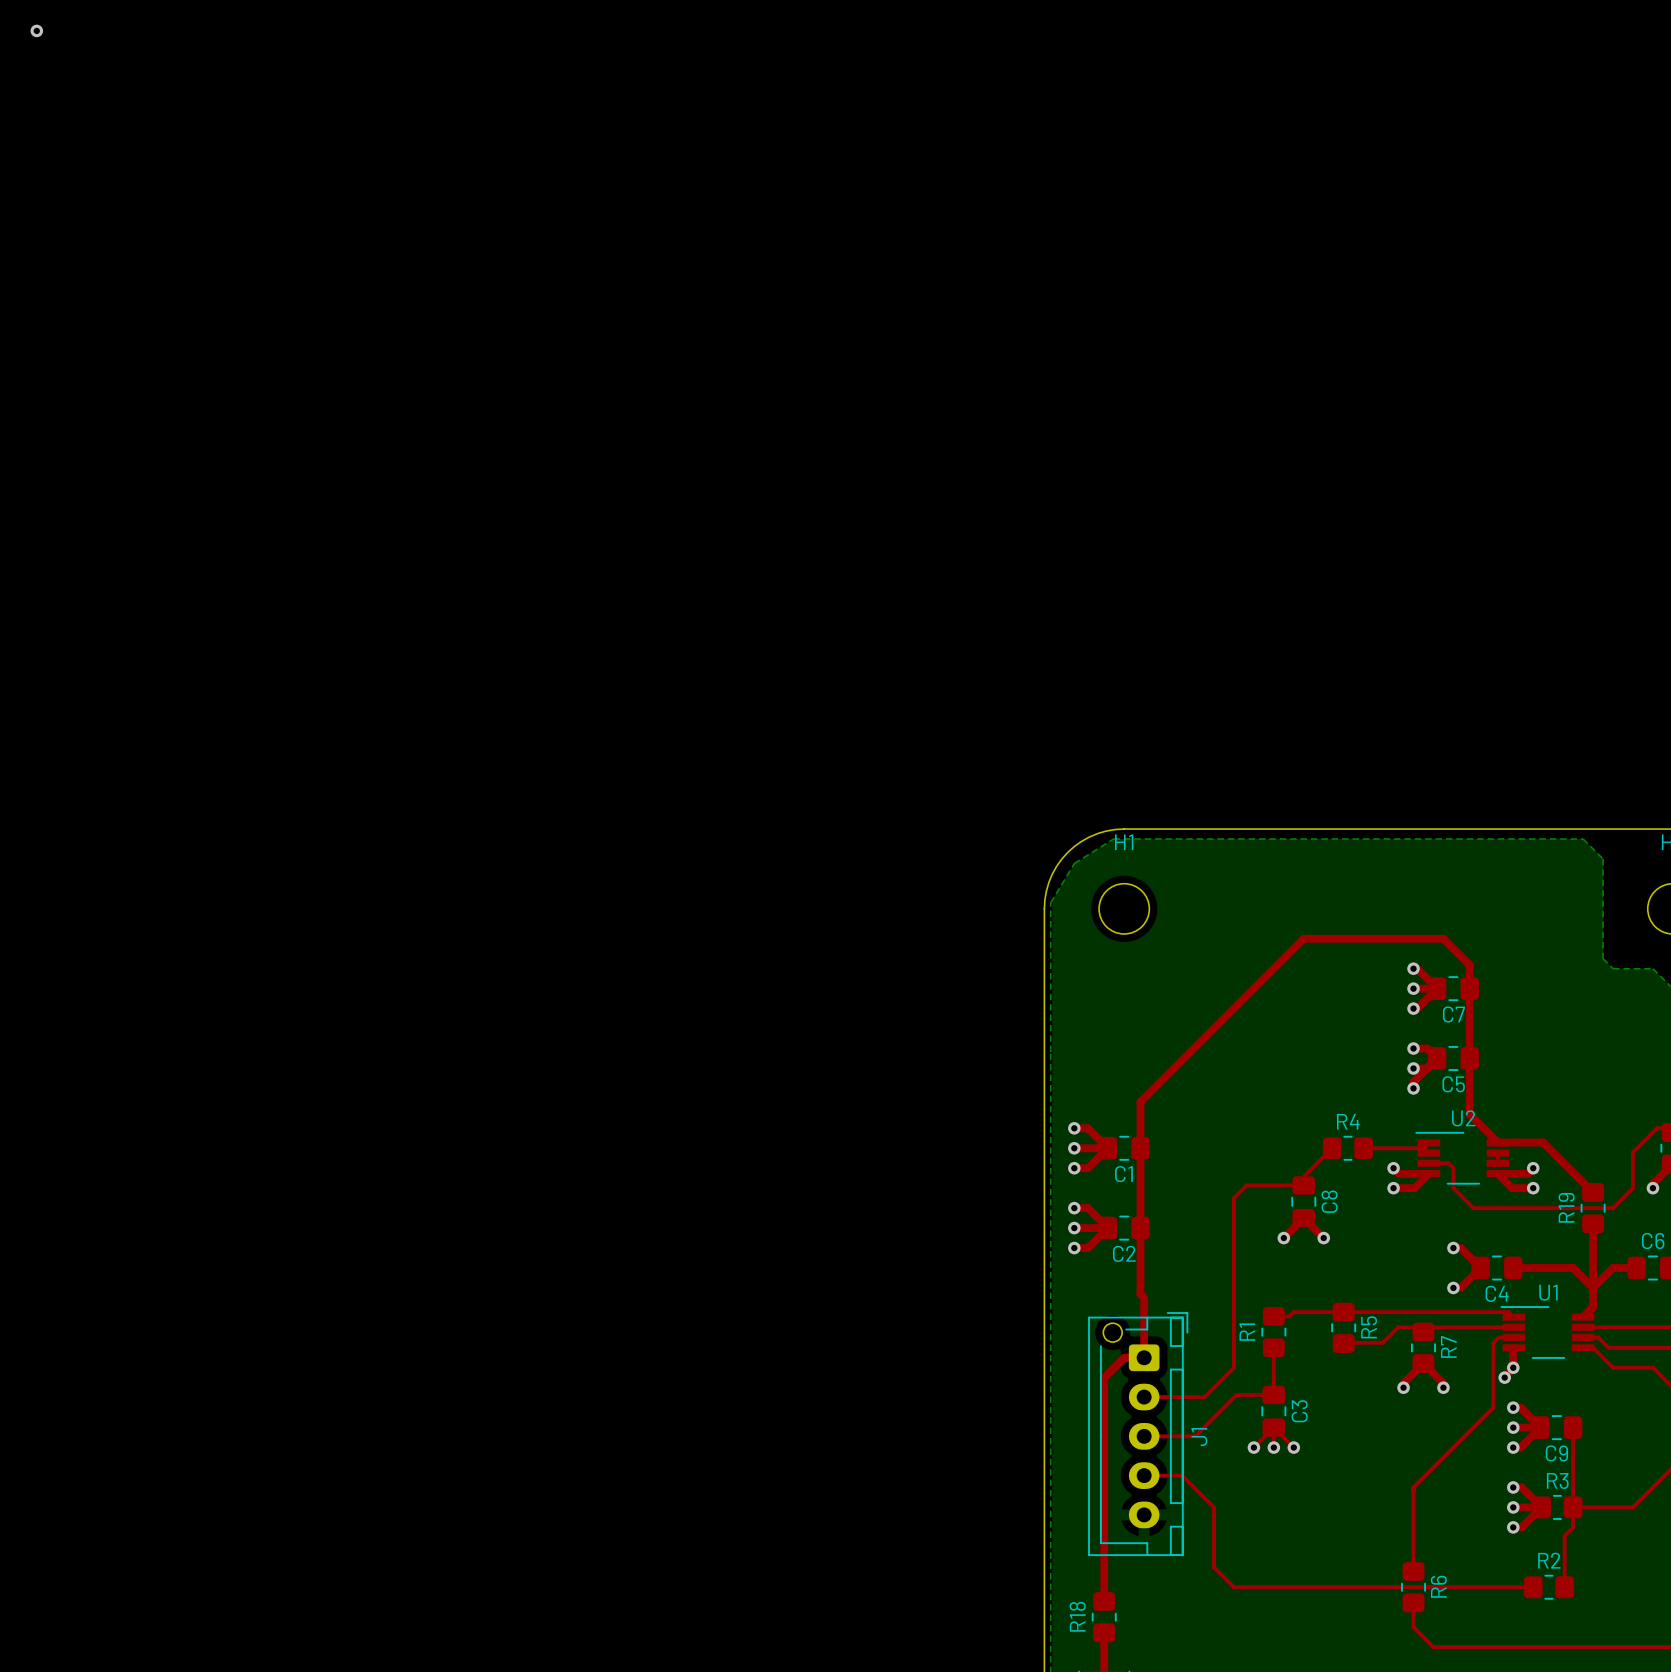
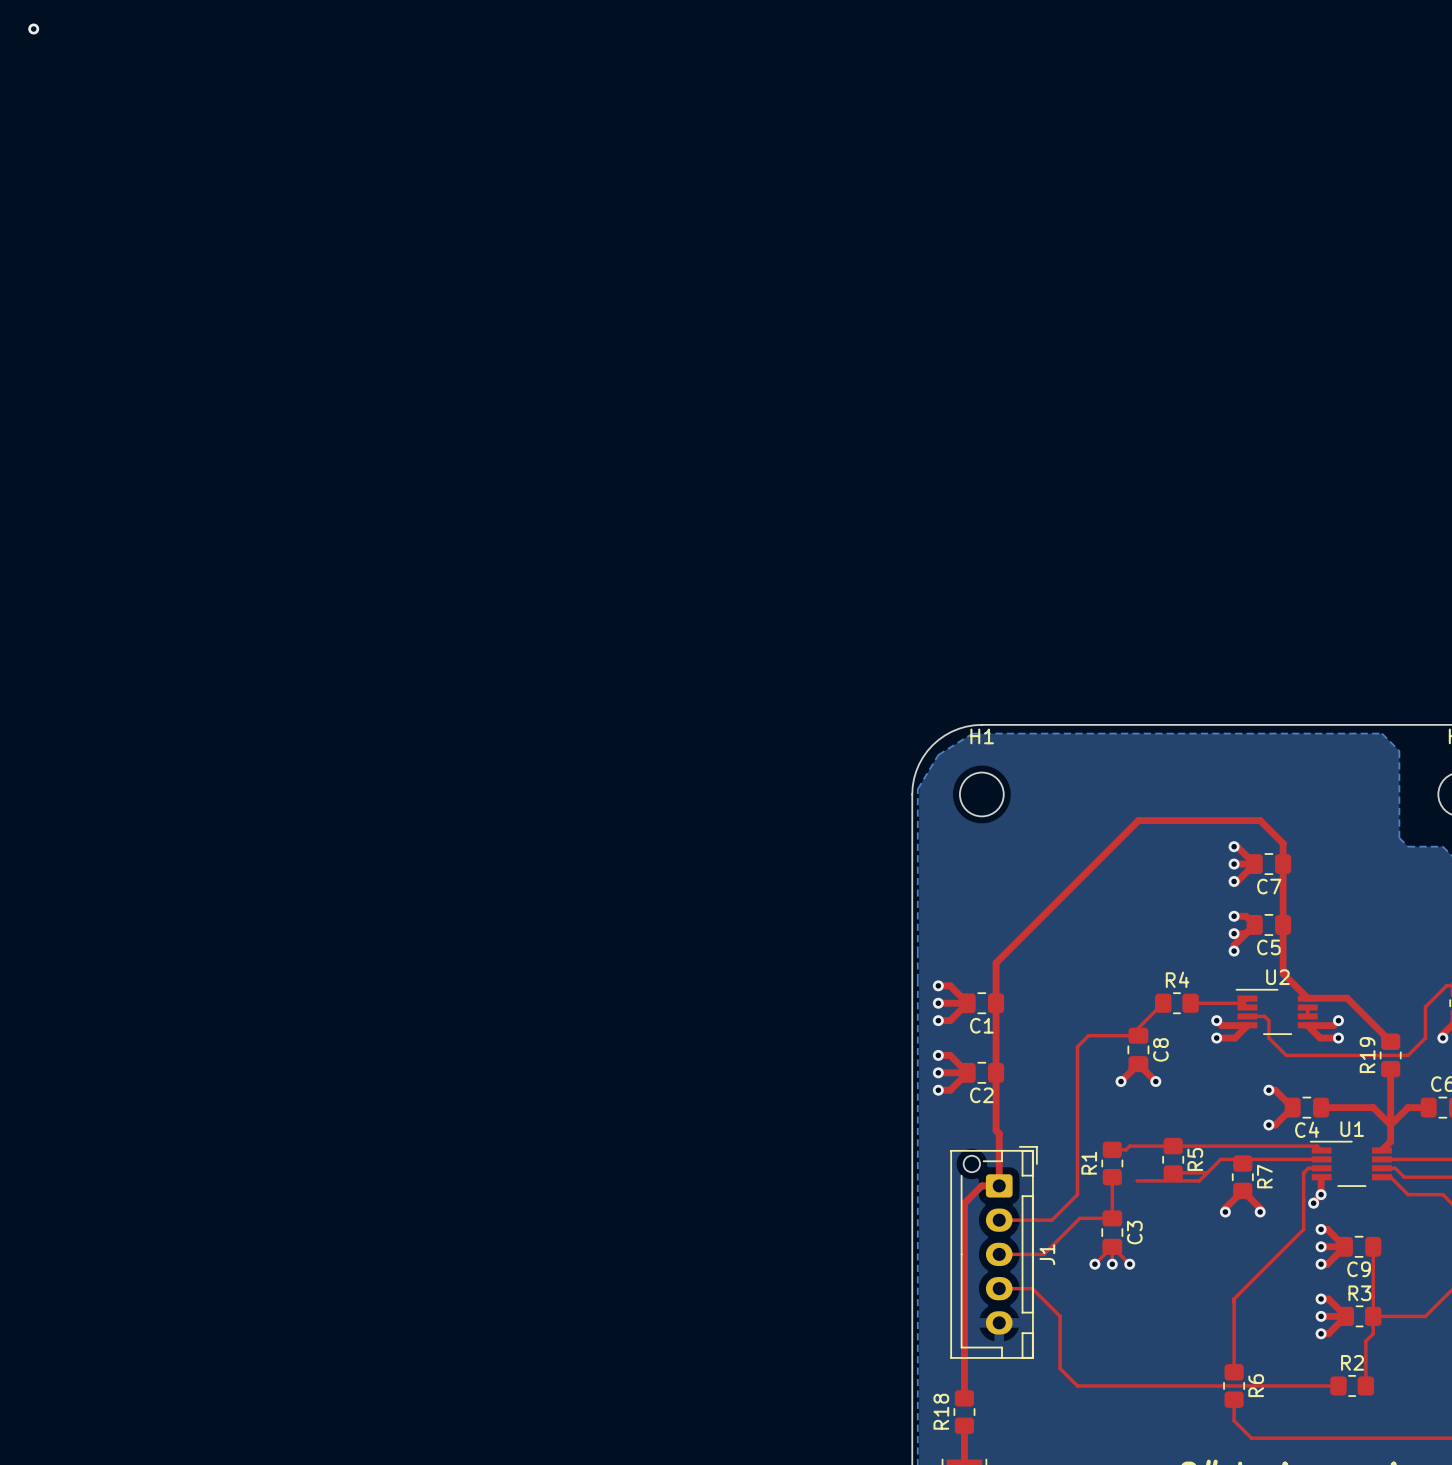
top track: none -> (1207, 1172) (1199, 1180) (1137, 1180)

